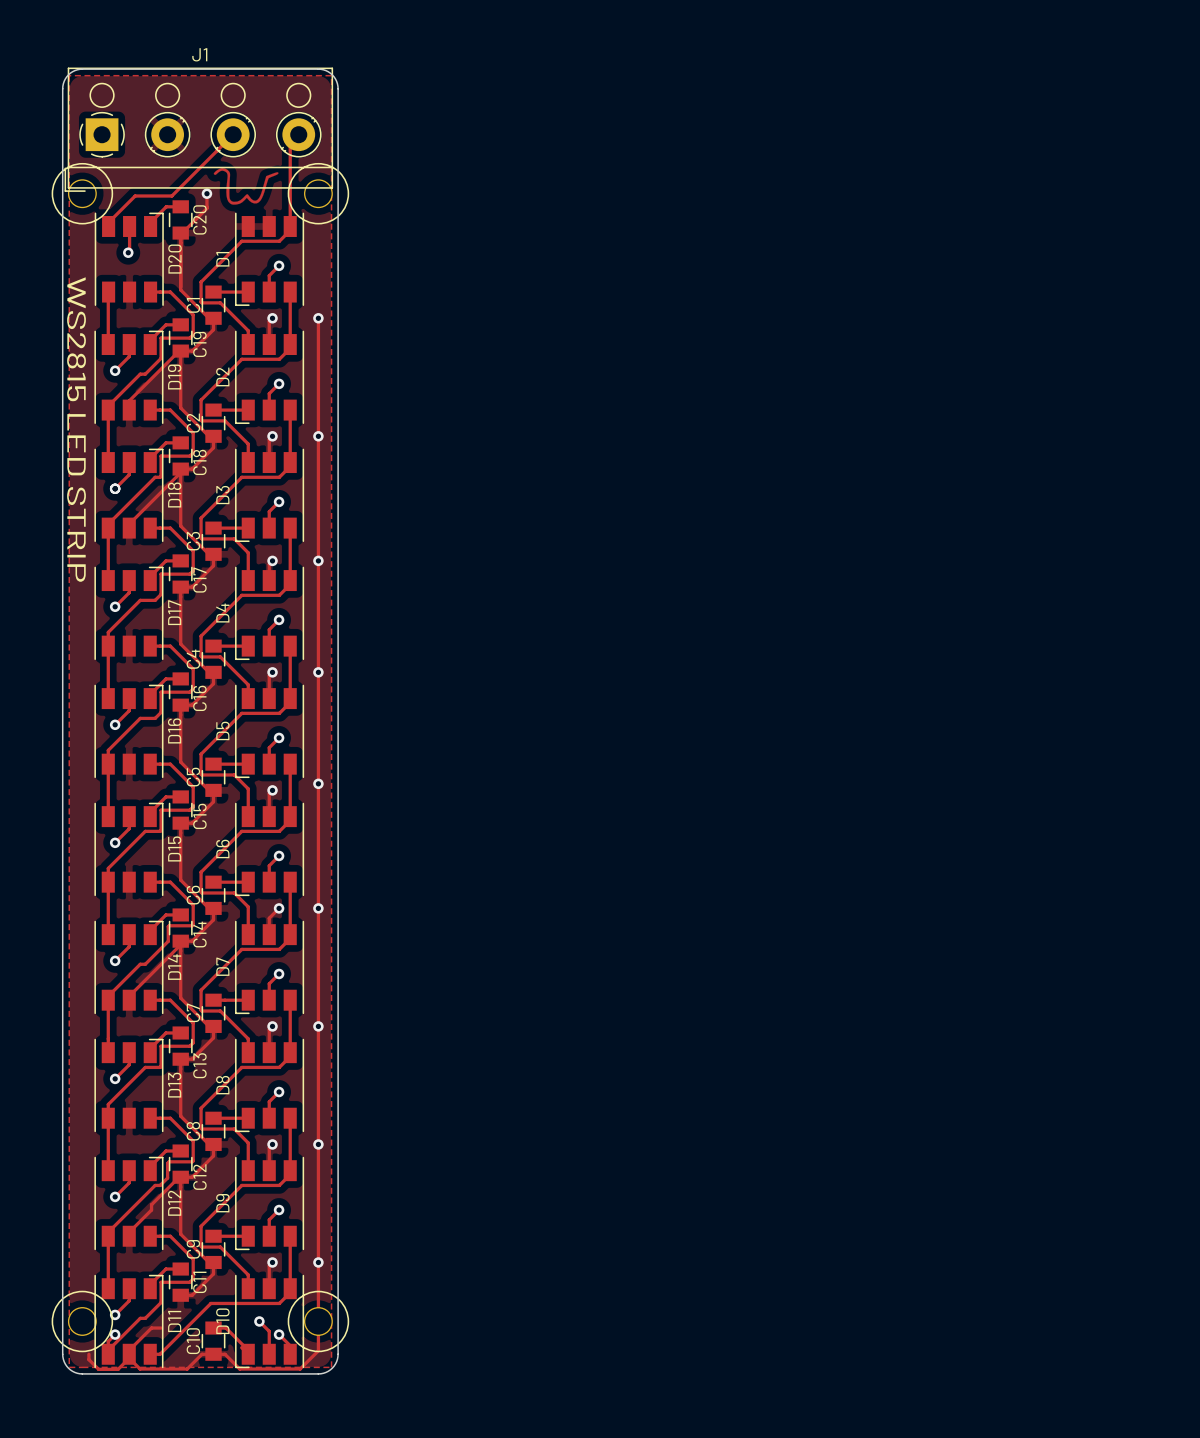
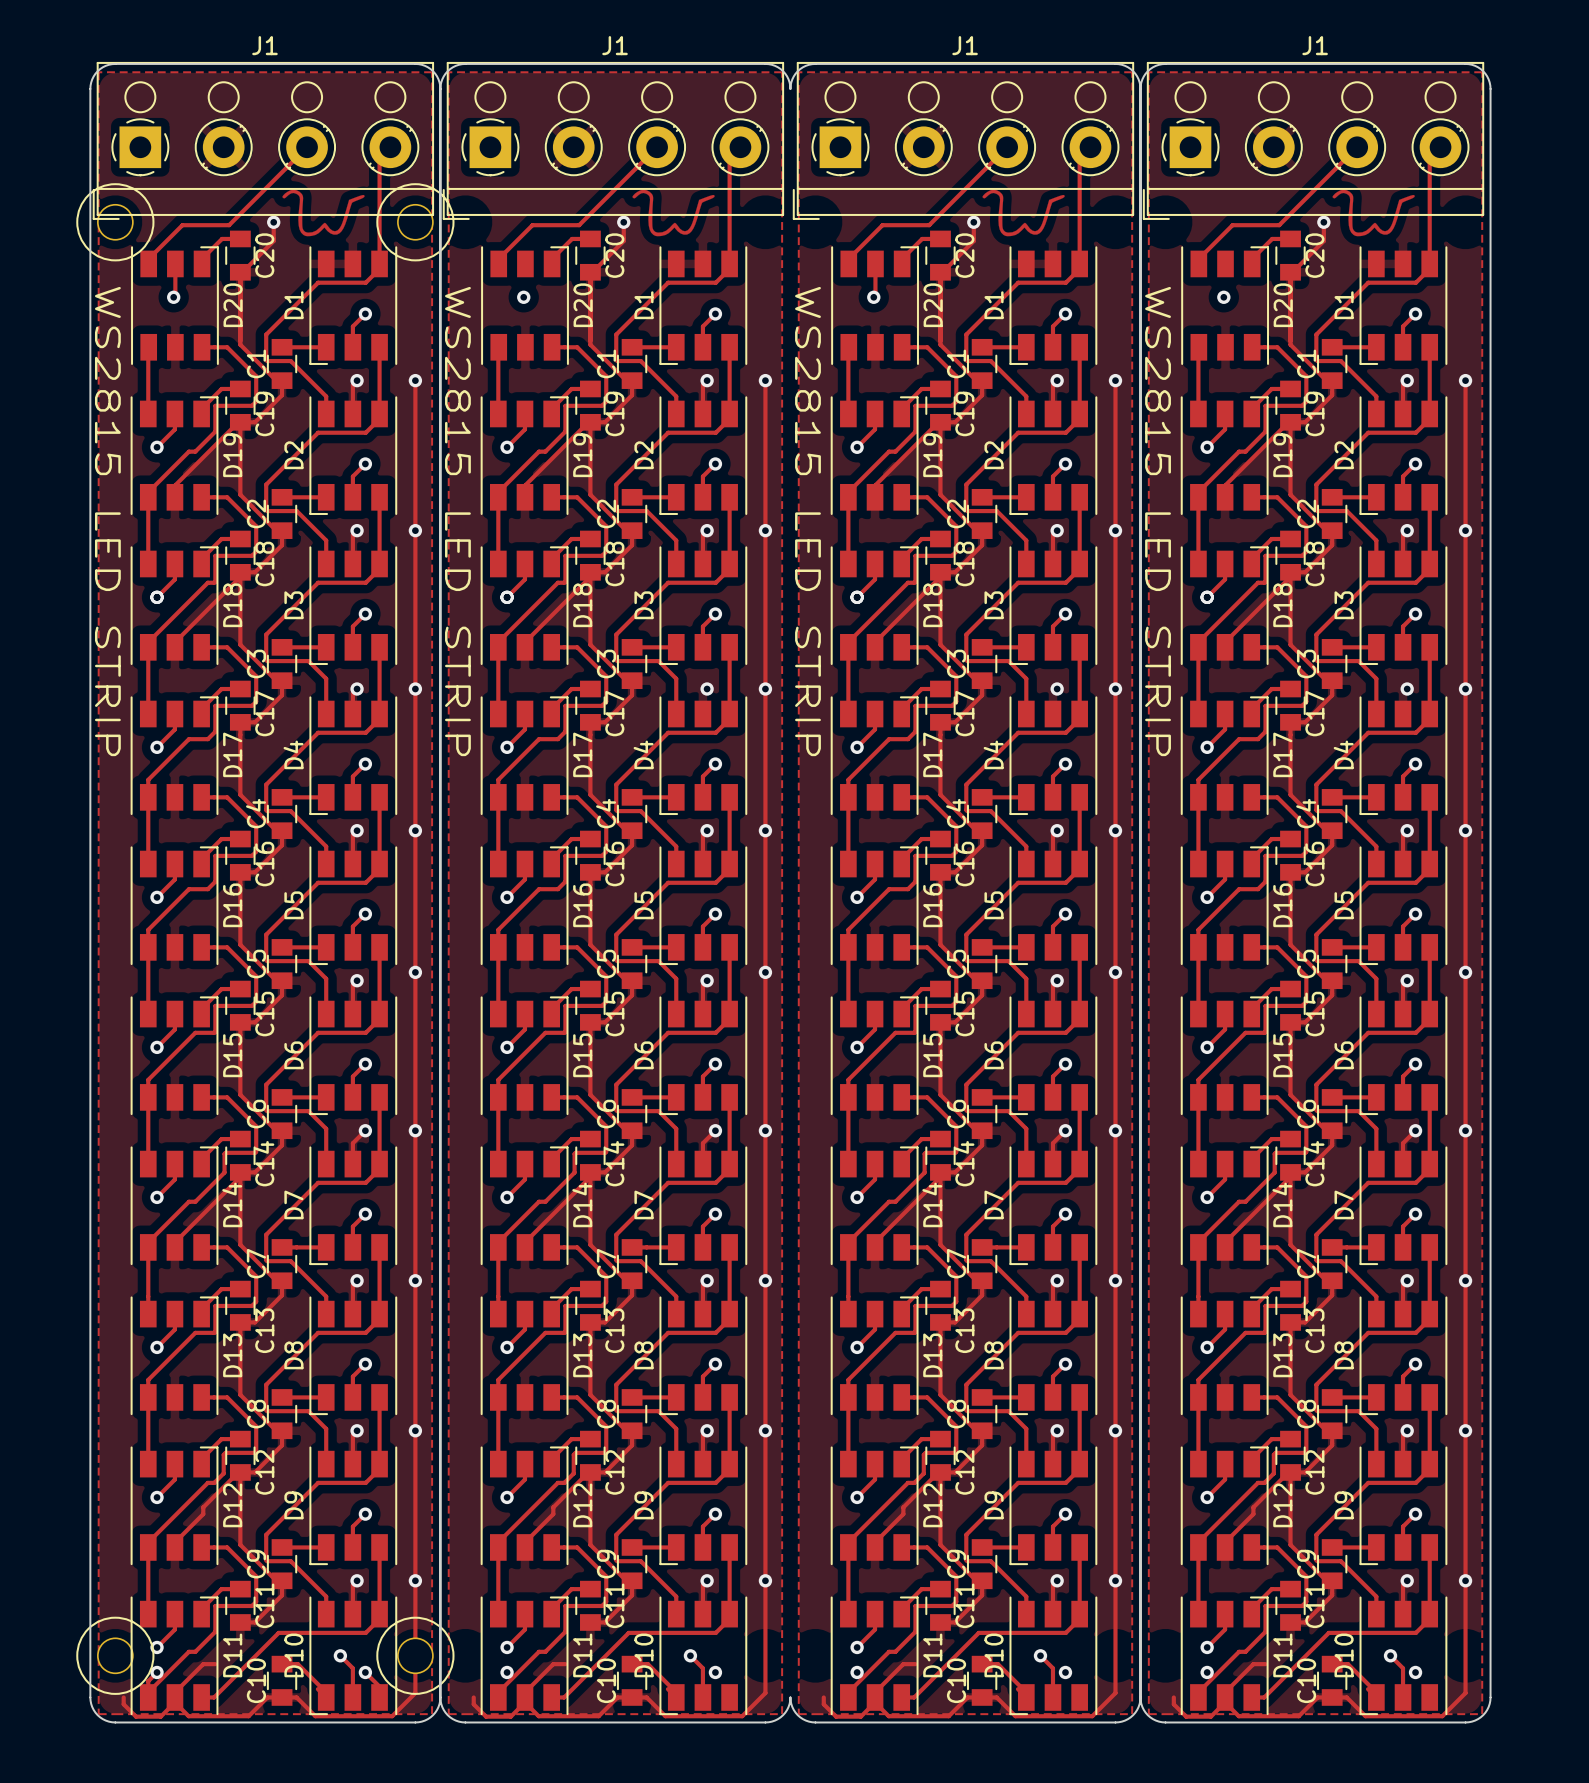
zone outline: none -> (448, 72) (782, 72) (782, 1714) (448, 1714) (448, 72)
zone outline: none -> (798, 72) (1132, 72) (1132, 1714) (798, 1714) (798, 72)
zone outline: none -> (1148, 72) (1482, 72) (1482, 1714) (1148, 1714) (1148, 72)
board edge: none -> (440, 88) (442, 79) (447, 71) (455, 65) (465, 63) (768, 64) (783, 71) (788, 79) (790, 88) (792, 79) (797, 71) (812, 64) (1115, 63) (1125, 65) (1133, 71) (1138, 79) (1140, 88)
board edge: none -> (1140, 88) (1142, 79) (1147, 71) (1155, 65) (1165, 63) (1468, 64) (1483, 71) (1488, 79) (1490, 88) (1489, 1703) (1480, 1717) (1465, 1722) (1165, 1722) (1155, 1720) (1147, 1715) (1142, 1707) (1140, 1697)
J1: none -> (613, 140)
J1: none -> (963, 140)
J1: none -> (1313, 140)
track: none -> (657, 147) (579, 225) (532, 225) (498, 258) (498, 263)
track: none -> (740, 147) (729, 158) (729, 268) (715, 282) (668, 282) (616, 334) (616, 359) (640, 361) (676, 396) (676, 413)
track: none -> (1007, 147) (929, 225) (882, 225) (848, 258) (848, 263)
track: none -> (1090, 147) (1079, 158) (1079, 268) (1065, 282) (1018, 282) (966, 334) (966, 359) (990, 361) (1026, 396) (1026, 413)
track: none -> (1357, 147) (1279, 225) (1232, 225) (1198, 258) (1198, 263)
track: none -> (1440, 147) (1429, 158) (1429, 268) (1415, 282) (1368, 282) (1316, 334) (1316, 359) (1340, 361) (1376, 396) (1376, 413)
drawing: none -> [632, 189, 715, 237]
drawing: none -> [982, 189, 1065, 237]
drawing: none -> [1332, 189, 1415, 237]
track: none -> (623, 222) (623, 241) (590, 272) (590, 344) (626, 380) (632, 380) (632, 395) (605, 422) (588, 422) (524, 485) (524, 497)
via: none -> (623, 222)
track: none -> (973, 222) (973, 241) (940, 272) (940, 344) (976, 380) (982, 380) (982, 395) (955, 422) (938, 422) (875, 485) (875, 497)
via: none -> (973, 222)
track: none -> (1323, 222) (1323, 241) (1290, 272) (1290, 344) (1326, 380) (1332, 380) (1332, 395) (1305, 422) (1288, 422) (1225, 485) (1225, 497)
via: none -> (1323, 222)
track: none -> (590, 238) (572, 238) (552, 258) (552, 263)
track: none -> (940, 238) (922, 238) (902, 258) (902, 263)
track: none -> (1290, 238) (1272, 238) (1252, 258) (1252, 263)
C20: none -> (590, 255)
C20: none -> (940, 255)
C20: none -> (1290, 255)
track: none -> (875, 263) (875, 295) (873, 297)
via: none -> (523, 297)
via: none -> (873, 297)
via: none -> (1223, 297)
D20: none -> (524, 305)
D1: none -> (703, 305)
D20: none -> (875, 305)
D1: none -> (1053, 305)
D20: none -> (1225, 305)
D1: none -> (1403, 305)
track: none -> (715, 313) (702, 326) (702, 347)
via: none -> (715, 313)
track: none -> (1065, 313) (1052, 326) (1052, 347)
via: none -> (1065, 313)
track: none -> (1415, 313) (1403, 326) (1403, 347)
via: none -> (1415, 313)
track: none -> (498, 347) (498, 413)
track: none -> (552, 347) (577, 347) (606, 376) (606, 401) (602, 405) (565, 405) (565, 431) (545, 451) (539, 451) (498, 492) (498, 563)
track: none -> (632, 347) (676, 347)
track: none -> (729, 347) (729, 418) (715, 432) (668, 432) (616, 484) (616, 509) (646, 511) (676, 540) (676, 563)
track: none -> (848, 347) (848, 413)
track: none -> (902, 347) (927, 347) (956, 376) (956, 401) (952, 405) (915, 405) (915, 431) (895, 451) (889, 451) (848, 492) (848, 563)
track: none -> (982, 347) (1026, 347)
track: none -> (1079, 347) (1079, 418) (1065, 432) (1018, 432) (966, 484) (966, 509) (996, 511) (1026, 540) (1026, 563)
track: none -> (1198, 347) (1198, 413)
track: none -> (1252, 347) (1277, 347) (1306, 376) (1306, 401) (1302, 405) (1265, 405) (1265, 431) (1245, 451) (1239, 451) (1198, 492) (1198, 563)
track: none -> (1332, 347) (1376, 347)
track: none -> (1429, 347) (1429, 418) (1415, 432) (1368, 432) (1316, 484) (1316, 509) (1346, 511) (1376, 540) (1376, 563)
C1: none -> (632, 363)
C1: none -> (982, 363)
C1: none -> (1332, 363)
track: none -> (707, 380) (702, 384) (702, 413)
via: none -> (707, 380)
track: none -> (765, 380) (765, 1693) (742, 1716) (665, 1716) (646, 1697) (617, 1697) (598, 1716) (538, 1716) (524, 1702)
via: none -> (765, 380)
track: none -> (1057, 380) (1052, 384) (1052, 413)
via: none -> (1057, 380)
track: none -> (1115, 380) (1115, 1693) (1092, 1716) (1015, 1716) (996, 1697) (967, 1697) (948, 1716) (888, 1716) (875, 1702)
via: none -> (1115, 380)
track: none -> (1407, 380) (1403, 384) (1403, 413)
via: none -> (1407, 380)
track: none -> (1465, 380) (1465, 1693) (1442, 1716) (1365, 1716) (1346, 1697) (1317, 1697) (1298, 1716) (1238, 1716) (1225, 1702)
via: none -> (1465, 380)
track: none -> (590, 388) (571, 388) (551, 408) (551, 413)
track: none -> (940, 388) (921, 388) (901, 408) (901, 413)
track: none -> (1290, 388) (1271, 388) (1251, 408) (1251, 413)
C19: none -> (590, 405)
C19: none -> (940, 405)
C19: none -> (1290, 405)
track: none -> (524, 413) (524, 429) (507, 447)
track: none -> (875, 413) (875, 429) (857, 447)
track: none -> (1225, 413) (1225, 429) (1207, 447)
track: none -> (590, 422) (590, 494) (626, 530) (632, 530) (632, 545) (605, 572) (590, 572) (590, 644) (626, 680) (632, 680) (632, 695) (605, 722) (590, 722) (590, 794) (626, 830) (632, 830) (632, 845) (605, 872) (590, 872) (590, 944) (626, 980) (632, 980) (632, 995) (605, 1022) (590, 1022) (590, 1094) (626, 1130) (632, 1130) (632, 1145) (605, 1172) (590, 1172) (590, 1244) (626, 1280) (632, 1280) (632, 1295) (605, 1322) (590, 1322) (590, 1394) (626, 1430) (632, 1430) (632, 1445) (605, 1472) (588, 1472) (553, 1507) (553, 1514) (524, 1542) (524, 1547)
track: none -> (940, 422) (940, 494) (976, 530) (982, 530) (982, 545) (955, 572) (940, 572) (940, 644) (976, 680) (982, 680) (982, 695) (955, 722) (940, 722) (940, 794) (976, 830) (982, 830) (982, 845) (955, 872) (940, 872) (940, 944) (976, 980) (982, 980) (982, 995) (955, 1022) (940, 1022) (940, 1094) (976, 1130) (982, 1130) (982, 1145) (955, 1172) (940, 1172) (940, 1244) (976, 1280) (982, 1280) (982, 1295) (955, 1322) (940, 1322) (940, 1394) (976, 1430) (982, 1430) (982, 1445) (955, 1472) (938, 1472) (903, 1507) (903, 1514) (875, 1542) (875, 1547)
track: none -> (1290, 422) (1290, 494) (1326, 530) (1332, 530) (1332, 545) (1305, 572) (1290, 572) (1290, 644) (1326, 680) (1332, 680) (1332, 695) (1305, 722) (1290, 722) (1290, 794) (1326, 830) (1332, 830) (1332, 845) (1305, 872) (1290, 872) (1290, 944) (1326, 980) (1332, 980) (1332, 995) (1305, 1022) (1290, 1022) (1290, 1094) (1326, 1130) (1332, 1130) (1332, 1145) (1305, 1172) (1290, 1172) (1290, 1244) (1326, 1280) (1332, 1280) (1332, 1295) (1305, 1322) (1290, 1322) (1290, 1394) (1326, 1430) (1332, 1430) (1332, 1445) (1305, 1472) (1288, 1472) (1253, 1507) (1253, 1514) (1225, 1542) (1225, 1547)
via: none -> (507, 447)
via: none -> (857, 447)
via: none -> (1207, 447)
D19: none -> (524, 455)
D2: none -> (703, 455)
D19: none -> (874, 455)
D2: none -> (1053, 455)
D19: none -> (1224, 455)
D2: none -> (1403, 455)
track: none -> (715, 463) (702, 476) (702, 497)
via: none -> (715, 463)
track: none -> (1065, 463) (1052, 476) (1052, 497)
via: none -> (1065, 463)
track: none -> (1415, 463) (1403, 476) (1403, 497)
via: none -> (1415, 463)
track: none -> (551, 497) (577, 497) (606, 526) (606, 551) (602, 555) (565, 555) (565, 581) (557, 582) (498, 642) (498, 714)
track: none -> (632, 497) (676, 497)
track: none -> (729, 497) (729, 568) (715, 582) (668, 582) (616, 634) (617, 661) (658, 661) (676, 678) (676, 714)
track: none -> (901, 497) (927, 497) (956, 526) (956, 551) (952, 555) (915, 555) (915, 581) (907, 582) (848, 642) (848, 714)
track: none -> (982, 497) (1026, 497)
track: none -> (1079, 497) (1079, 568) (1065, 582) (1018, 582) (966, 634) (967, 661) (1008, 661) (1026, 678) (1026, 714)
track: none -> (1251, 497) (1277, 497) (1306, 526) (1306, 551) (1302, 555) (1265, 555) (1265, 581) (1258, 582) (1198, 642) (1198, 714)
track: none -> (1332, 497) (1376, 497)
track: none -> (1429, 497) (1429, 568) (1415, 582) (1368, 582) (1316, 634) (1317, 661) (1358, 661) (1376, 678) (1376, 714)
C2: none -> (632, 513)
C2: none -> (982, 513)
C2: none -> (1332, 513)
text: none -> WS2815 LED STRIP (457, 521)
text: none -> WS2815 LED STRIP (807, 521)
text: none -> WS2815 LED STRIP (1158, 521)
track: none -> (707, 530) (702, 534) (702, 563)
via: none -> (707, 530)
via: none -> (765, 530)
track: none -> (1057, 530) (1052, 534) (1052, 563)
via: none -> (1057, 530)
via: none -> (1115, 530)
track: none -> (1407, 530) (1403, 534) (1403, 563)
via: none -> (1407, 530)
via: none -> (1465, 530)
track: none -> (590, 538) (571, 538) (551, 558) (551, 563)
track: none -> (940, 538) (921, 538) (901, 558) (901, 563)
track: none -> (1290, 538) (1271, 538) (1251, 558) (1251, 563)
C18: none -> (590, 555)
C18: none -> (940, 555)
C18: none -> (1290, 555)
track: none -> (524, 563) (524, 579) (507, 597)
track: none -> (875, 563) (875, 579) (857, 597)
track: none -> (1225, 563) (1225, 579) (1207, 597)
track: none -> (590, 576) (524, 642) (524, 647)
track: none -> (940, 576) (875, 642) (875, 647)
track: none -> (1290, 576) (1225, 642) (1225, 647)
via: none -> (507, 597)
via: none -> (857, 597)
via: none -> (1207, 597)
D18: none -> (524, 605)
D3: none -> (703, 605)
D18: none -> (874, 605)
D3: none -> (1053, 605)
D18: none -> (1224, 605)
D3: none -> (1403, 605)
track: none -> (715, 614) (702, 626) (702, 647)
via: none -> (715, 614)
track: none -> (1065, 614) (1052, 626) (1052, 647)
via: none -> (1065, 614)
track: none -> (1415, 614) (1403, 626) (1403, 647)
via: none -> (1415, 614)
track: none -> (551, 647) (577, 647) (606, 676) (606, 701) (602, 705) (565, 705) (565, 731) (557, 739) (539, 739) (498, 779) (498, 864)
track: none -> (632, 647) (676, 647)
track: none -> (729, 647) (729, 719) (715, 732) (668, 732) (616, 784) (616, 810) (640, 811) (676, 846) (676, 864)
track: none -> (901, 647) (927, 647) (956, 676) (956, 701) (952, 705) (915, 705) (915, 731) (907, 739) (889, 739) (848, 779) (848, 864)
track: none -> (982, 647) (1026, 647)
track: none -> (1079, 647) (1079, 719) (1065, 732) (1018, 732) (966, 784) (966, 810) (990, 811) (1026, 846) (1026, 864)
track: none -> (1251, 647) (1277, 647) (1306, 676) (1306, 701) (1302, 705) (1265, 705) (1265, 731) (1258, 739) (1239, 739) (1198, 779) (1198, 864)
track: none -> (1332, 647) (1376, 647)
track: none -> (1429, 647) (1429, 719) (1415, 732) (1368, 732) (1316, 784) (1316, 810) (1340, 811) (1376, 846) (1376, 864)
C3: none -> (632, 664)
C3: none -> (982, 664)
C3: none -> (1332, 664)
track: none -> (590, 689) (571, 689) (551, 709) (551, 714)
via: none -> (707, 689)
via: none -> (765, 689)
track: none -> (940, 689) (921, 689) (901, 709) (901, 714)
via: none -> (1057, 689)
via: none -> (1115, 689)
track: none -> (1290, 689) (1271, 689) (1251, 709) (1251, 714)
via: none -> (1407, 689)
via: none -> (1465, 689)
C17: none -> (590, 705)
C17: none -> (940, 705)
C17: none -> (1290, 705)
track: none -> (524, 714) (524, 729) (507, 747)
track: none -> (875, 714) (875, 729) (857, 747)
track: none -> (1225, 714) (1225, 729) (1207, 747)
via: none -> (507, 747)
via: none -> (857, 747)
via: none -> (1207, 747)
D17: none -> (524, 755)
D4: none -> (703, 755)
D17: none -> (874, 755)
D4: none -> (1053, 755)
D17: none -> (1224, 755)
D4: none -> (1403, 755)
track: none -> (715, 764) (702, 776) (702, 797)
via: none -> (715, 764)
track: none -> (1065, 764) (1052, 776) (1052, 797)
via: none -> (1065, 764)
track: none -> (1415, 764) (1403, 776) (1403, 797)
via: none -> (1415, 764)
track: none -> (551, 797) (577, 797) (606, 826) (606, 851) (602, 855) (565, 855) (565, 881) (557, 889) (539, 889) (498, 929) (498, 1014)
track: none -> (632, 797) (676, 797)
track: none -> (729, 797) (729, 869) (715, 882) (668, 882) (616, 934) (617, 961) (658, 961) (676, 978) (676, 1014)
track: none -> (901, 797) (927, 797) (956, 826) (956, 851) (952, 855) (915, 855) (915, 881) (907, 889) (889, 889) (848, 929) (848, 1014)
track: none -> (982, 797) (1026, 797)
track: none -> (1079, 797) (1079, 869) (1065, 882) (1018, 882) (966, 934) (967, 961) (1008, 961) (1026, 978) (1026, 1014)
track: none -> (1251, 797) (1277, 797) (1306, 826) (1306, 851) (1302, 855) (1265, 855) (1265, 881) (1258, 889) (1239, 889) (1198, 929) (1198, 1014)
track: none -> (1332, 797) (1376, 797)
track: none -> (1429, 797) (1429, 869) (1415, 882) (1368, 882) (1316, 934) (1317, 961) (1358, 961) (1376, 978) (1376, 1014)
C4: none -> (632, 814)
C4: none -> (982, 814)
C4: none -> (1332, 814)
track: none -> (707, 830) (702, 834) (702, 864)
via: none -> (707, 830)
via: none -> (765, 830)
track: none -> (1057, 830) (1052, 834) (1052, 864)
via: none -> (1057, 830)
via: none -> (1115, 830)
track: none -> (1407, 830) (1403, 834) (1403, 864)
via: none -> (1407, 830)
via: none -> (1465, 830)
track: none -> (590, 839) (571, 839) (551, 859) (551, 864)
track: none -> (940, 839) (921, 839) (901, 859) (901, 864)
track: none -> (1290, 839) (1271, 839) (1251, 859) (1251, 864)
C16: none -> (590, 855)
C16: none -> (940, 855)
C16: none -> (1290, 855)
track: none -> (524, 864) (524, 879) (507, 897)
track: none -> (875, 864) (875, 879) (857, 897)
track: none -> (1225, 864) (1225, 879) (1207, 897)
via: none -> (507, 897)
via: none -> (857, 897)
via: none -> (1207, 897)
D16: none -> (524, 905)
D5: none -> (703, 905)
D16: none -> (874, 905)
D5: none -> (1053, 905)
D16: none -> (1224, 905)
D5: none -> (1403, 905)
track: none -> (715, 914) (702, 926) (702, 947)
via: none -> (715, 914)
track: none -> (1065, 914) (1052, 926) (1052, 947)
via: none -> (1065, 914)
track: none -> (1415, 914) (1403, 926) (1403, 947)
via: none -> (1415, 914)
track: none -> (551, 947) (577, 947) (606, 976) (606, 1001) (602, 1005) (565, 1005) (565, 1031) (545, 1032) (498, 1079) (498, 1164)
track: none -> (632, 947) (676, 947)
track: none -> (729, 947) (729, 1019) (715, 1032) (668, 1032) (616, 1084) (617, 1111) (658, 1111) (676, 1128) (676, 1164)
track: none -> (901, 947) (927, 947) (956, 976) (956, 1001) (952, 1005) (915, 1005) (915, 1031) (895, 1032) (848, 1079) (848, 1164)
track: none -> (982, 947) (1026, 947)
track: none -> (1079, 947) (1079, 1019) (1065, 1032) (1018, 1032) (966, 1084) (967, 1111) (1008, 1111) (1026, 1128) (1026, 1164)
track: none -> (1251, 947) (1277, 947) (1306, 976) (1306, 1001) (1302, 1005) (1265, 1005) (1265, 1031) (1245, 1032) (1198, 1079) (1198, 1164)
track: none -> (1332, 947) (1376, 947)
track: none -> (1429, 947) (1429, 1019) (1415, 1032) (1368, 1032) (1316, 1084) (1317, 1111) (1358, 1111) (1376, 1128) (1376, 1164)
C5: none -> (632, 964)
C5: none -> (982, 964)
C5: none -> (1332, 964)
via: none -> (765, 972)
via: none -> (1115, 972)
via: none -> (1465, 972)
track: none -> (707, 980) (702, 984) (702, 1014)
via: none -> (707, 980)
track: none -> (1057, 980) (1052, 984) (1052, 1014)
via: none -> (1057, 980)
track: none -> (1407, 980) (1403, 984) (1403, 1014)
via: none -> (1407, 980)
track: none -> (590, 989) (571, 989) (551, 1009) (551, 1014)
track: none -> (940, 989) (921, 989) (901, 1009) (901, 1014)
track: none -> (1290, 989) (1271, 989) (1251, 1009) (1251, 1014)
C15: none -> (590, 1005)
C15: none -> (940, 1005)
C15: none -> (1290, 1005)
track: none -> (524, 1014) (524, 1029) (507, 1047)
track: none -> (875, 1014) (875, 1029) (857, 1047)
track: none -> (1225, 1014) (1225, 1029) (1207, 1047)
via: none -> (507, 1047)
via: none -> (857, 1047)
via: none -> (1207, 1047)
D15: none -> (524, 1055)
D6: none -> (703, 1055)
D15: none -> (874, 1055)
D6: none -> (1053, 1055)
D15: none -> (1224, 1055)
D6: none -> (1403, 1055)
track: none -> (715, 1064) (702, 1076) (702, 1097)
via: none -> (715, 1064)
track: none -> (1065, 1064) (1052, 1076) (1052, 1097)
via: none -> (1065, 1064)
track: none -> (1415, 1064) (1403, 1076) (1403, 1097)
via: none -> (1415, 1064)
track: none -> (551, 1097) (577, 1097) (606, 1126) (606, 1151) (575, 1152) (574, 1172) (545, 1201) (539, 1201) (498, 1242) (498, 1314)
track: none -> (632, 1097) (676, 1097)
track: none -> (729, 1097) (729, 1169) (715, 1182) (668, 1182) (616, 1234) (616, 1260) (640, 1261) (676, 1296) (676, 1314)
track: none -> (901, 1097) (927, 1097) (956, 1126) (956, 1151) (925, 1152) (924, 1172) (895, 1201) (889, 1201) (848, 1242) (848, 1314)
track: none -> (982, 1097) (1026, 1097)
track: none -> (1079, 1097) (1079, 1169) (1065, 1182) (1018, 1182) (966, 1234) (966, 1260) (990, 1261) (1026, 1296) (1026, 1314)
track: none -> (1251, 1097) (1277, 1097) (1306, 1126) (1306, 1151) (1275, 1152) (1274, 1172) (1245, 1201) (1239, 1201) (1198, 1242) (1198, 1314)
track: none -> (1332, 1097) (1376, 1097)
track: none -> (1429, 1097) (1429, 1169) (1415, 1182) (1368, 1182) (1316, 1234) (1316, 1260) (1340, 1261) (1376, 1296) (1376, 1314)
C6: none -> (632, 1114)
C6: none -> (982, 1114)
C6: none -> (1332, 1114)
track: none -> (715, 1130) (702, 1143) (702, 1164)
via: none -> (715, 1130)
via: none -> (765, 1130)
track: none -> (1065, 1130) (1052, 1143) (1052, 1164)
via: none -> (1065, 1130)
via: none -> (1115, 1130)
track: none -> (1415, 1130) (1403, 1143) (1403, 1164)
via: none -> (1415, 1130)
via: none -> (1465, 1130)
track: none -> (590, 1139) (571, 1139) (551, 1159) (551, 1164)
track: none -> (940, 1139) (921, 1139) (901, 1159) (901, 1164)
track: none -> (1290, 1139) (1271, 1139) (1251, 1159) (1251, 1164)
C14: none -> (590, 1155)
C14: none -> (940, 1155)
C14: none -> (1290, 1155)
track: none -> (524, 1164) (524, 1179) (507, 1197)
track: none -> (875, 1164) (875, 1179) (857, 1197)
track: none -> (1225, 1164) (1225, 1179) (1207, 1197)
track: none -> (590, 1176) (524, 1242) (524, 1247)
track: none -> (940, 1176) (875, 1242) (875, 1247)
track: none -> (1290, 1176) (1225, 1242) (1225, 1247)
via: none -> (507, 1197)
via: none -> (857, 1197)
via: none -> (1207, 1197)
D14: none -> (524, 1205)
D7: none -> (703, 1205)
D14: none -> (874, 1205)
D7: none -> (1053, 1205)
D14: none -> (1224, 1205)
D7: none -> (1403, 1205)
track: none -> (715, 1214) (702, 1226) (702, 1247)
via: none -> (715, 1214)
track: none -> (1065, 1214) (1052, 1226) (1052, 1247)
via: none -> (1065, 1214)
track: none -> (1415, 1214) (1403, 1226) (1403, 1247)
via: none -> (1415, 1214)
track: none -> (551, 1247) (577, 1247) (606, 1276) (606, 1301) (602, 1305) (565, 1305) (565, 1331) (545, 1332) (498, 1379) (498, 1464)
track: none -> (632, 1247) (676, 1247)
track: none -> (729, 1247) (729, 1319) (715, 1332) (668, 1332) (616, 1384) (617, 1411) (658, 1411) (676, 1428) (676, 1464)
track: none -> (901, 1247) (927, 1247) (956, 1276) (956, 1301) (952, 1305) (915, 1305) (915, 1331) (895, 1332) (848, 1379) (848, 1464)
track: none -> (982, 1247) (1026, 1247)
track: none -> (1079, 1247) (1079, 1319) (1065, 1332) (1018, 1332) (966, 1384) (967, 1411) (1008, 1411) (1026, 1428) (1026, 1464)
track: none -> (1251, 1247) (1277, 1247) (1306, 1276) (1306, 1301) (1302, 1305) (1265, 1305) (1265, 1331) (1245, 1332) (1198, 1379) (1198, 1464)
track: none -> (1332, 1247) (1376, 1247)
track: none -> (1429, 1247) (1429, 1319) (1415, 1332) (1368, 1332) (1316, 1384) (1317, 1411) (1358, 1411) (1376, 1428) (1376, 1464)
C7: none -> (632, 1264)
C7: none -> (982, 1264)
C7: none -> (1332, 1264)
track: none -> (707, 1280) (702, 1284) (702, 1314)
via: none -> (707, 1280)
via: none -> (765, 1280)
track: none -> (1057, 1280) (1052, 1284) (1052, 1314)
via: none -> (1057, 1280)
via: none -> (1115, 1280)
track: none -> (1407, 1280) (1403, 1284) (1403, 1314)
via: none -> (1407, 1280)
via: none -> (1465, 1280)
track: none -> (590, 1289) (571, 1289) (551, 1309) (551, 1314)
track: none -> (940, 1289) (921, 1289) (901, 1309) (901, 1314)
track: none -> (1290, 1289) (1271, 1289) (1251, 1309) (1251, 1314)
C13: none -> (590, 1305)
C13: none -> (940, 1305)
C13: none -> (1290, 1305)
track: none -> (524, 1314) (524, 1329) (507, 1347)
track: none -> (875, 1314) (875, 1329) (857, 1347)
track: none -> (1225, 1314) (1225, 1329) (1207, 1347)
via: none -> (507, 1347)
via: none -> (857, 1347)
via: none -> (1207, 1347)
D13: none -> (524, 1355)
D8: none -> (703, 1355)
D13: none -> (874, 1355)
D8: none -> (1053, 1355)
D13: none -> (1224, 1355)
D8: none -> (1403, 1355)
track: none -> (715, 1364) (702, 1376) (702, 1397)
via: none -> (715, 1364)
track: none -> (1065, 1364) (1052, 1376) (1052, 1397)
via: none -> (1065, 1364)
track: none -> (1415, 1364) (1403, 1376) (1403, 1397)
via: none -> (1415, 1364)
track: none -> (551, 1397) (577, 1397) (606, 1426) (606, 1451) (575, 1452) (573, 1454) (573, 1473) (564, 1482) (557, 1482) (498, 1542) (498, 1614)
track: none -> (632, 1397) (676, 1397)
track: none -> (729, 1397) (729, 1469) (715, 1482) (668, 1482) (616, 1534) (616, 1560) (640, 1561) (676, 1596) (676, 1614)
track: none -> (901, 1397) (927, 1397) (956, 1426) (956, 1451) (925, 1452) (923, 1454) (923, 1473) (914, 1482) (907, 1482) (848, 1542) (848, 1614)
track: none -> (982, 1397) (1026, 1397)
track: none -> (1079, 1397) (1079, 1469) (1065, 1482) (1018, 1482) (966, 1534) (966, 1560) (990, 1561) (1026, 1596) (1026, 1614)
track: none -> (1251, 1397) (1277, 1397) (1306, 1426) (1306, 1451) (1275, 1452) (1273, 1454) (1273, 1473) (1264, 1482) (1258, 1482) (1198, 1542) (1198, 1614)
track: none -> (1332, 1397) (1376, 1397)
track: none -> (1429, 1397) (1429, 1469) (1415, 1482) (1368, 1482) (1316, 1534) (1316, 1560) (1340, 1561) (1376, 1596) (1376, 1614)
C8: none -> (632, 1414)
C8: none -> (982, 1414)
C8: none -> (1332, 1414)
track: none -> (707, 1430) (702, 1434) (702, 1464)
via: none -> (707, 1430)
via: none -> (765, 1430)
track: none -> (1057, 1430) (1052, 1434) (1052, 1464)
via: none -> (1057, 1430)
via: none -> (1115, 1430)
track: none -> (1407, 1430) (1403, 1434) (1403, 1464)
via: none -> (1407, 1430)
via: none -> (1465, 1430)
track: none -> (590, 1439) (571, 1439) (551, 1459) (551, 1464)
track: none -> (940, 1439) (921, 1439) (901, 1459) (901, 1464)
track: none -> (1290, 1439) (1271, 1439) (1251, 1459) (1251, 1464)
C12: none -> (590, 1455)
C12: none -> (940, 1455)
C12: none -> (1290, 1455)
track: none -> (524, 1464) (524, 1479) (507, 1497)
track: none -> (875, 1464) (875, 1479) (857, 1497)
track: none -> (1225, 1464) (1225, 1479) (1207, 1497)
track: none -> (590, 1472) (590, 1544) (626, 1580) (632, 1580) (632, 1595) (605, 1622) (590, 1622)
track: none -> (940, 1472) (940, 1544) (976, 1580) (982, 1580) (982, 1595) (955, 1622) (940, 1622)
track: none -> (1290, 1472) (1290, 1544) (1326, 1580) (1332, 1580) (1332, 1595) (1305, 1622) (1290, 1622)
via: none -> (507, 1497)
via: none -> (857, 1497)
via: none -> (1207, 1497)
D12: none -> (524, 1505)
D9: none -> (703, 1505)
D12: none -> (874, 1505)
D9: none -> (1053, 1505)
D12: none -> (1224, 1505)
D9: none -> (1403, 1505)
track: none -> (715, 1514) (702, 1526) (702, 1547)
via: none -> (715, 1514)
track: none -> (1065, 1514) (1052, 1526) (1052, 1547)
via: none -> (1065, 1514)
track: none -> (1415, 1514) (1403, 1526) (1403, 1547)
via: none -> (1415, 1514)
track: none -> (551, 1547) (577, 1547) (606, 1576) (606, 1601) (602, 1605) (565, 1605) (565, 1631) (545, 1651) (539, 1651) (498, 1692)
track: none -> (632, 1547) (676, 1547)
track: none -> (729, 1547) (729, 1619) (715, 1632) (628, 1632) (564, 1697) (551, 1697)
track: none -> (901, 1547) (927, 1547) (956, 1576) (956, 1601) (952, 1605) (915, 1605) (915, 1631) (895, 1651) (889, 1651) (848, 1692)
track: none -> (982, 1547) (1026, 1547)
track: none -> (1079, 1547) (1079, 1619) (1065, 1632) (978, 1632) (914, 1697) (901, 1697)
track: none -> (1251, 1547) (1277, 1547) (1306, 1576) (1306, 1601) (1302, 1605) (1265, 1605) (1265, 1631) (1245, 1651) (1239, 1651) (1198, 1692)
track: none -> (1332, 1547) (1376, 1547)
track: none -> (1429, 1547) (1429, 1619) (1415, 1632) (1328, 1632) (1264, 1697) (1251, 1697)
C9: none -> (632, 1564)
C9: none -> (982, 1564)
C9: none -> (1332, 1564)
track: none -> (707, 1580) (702, 1584) (702, 1614)
via: none -> (707, 1580)
via: none -> (765, 1580)
track: none -> (1057, 1580) (1052, 1584) (1052, 1614)
via: none -> (1057, 1580)
via: none -> (1115, 1580)
track: none -> (1407, 1580) (1403, 1584) (1403, 1614)
via: none -> (1407, 1580)
via: none -> (1465, 1580)
track: none -> (590, 1589) (571, 1589) (551, 1609) (551, 1614)
track: none -> (940, 1589) (921, 1589) (901, 1609) (901, 1614)
track: none -> (1290, 1589) (1271, 1589) (1251, 1609) (1251, 1614)
C11: none -> (590, 1605)
C11: none -> (940, 1605)
C11: none -> (1290, 1605)
track: none -> (524, 1614) (524, 1629) (507, 1647)
track: none -> (875, 1614) (875, 1629) (857, 1647)
track: none -> (1225, 1614) (1225, 1629) (1207, 1647)
via: none -> (507, 1647)
via: none -> (857, 1647)
via: none -> (1207, 1647)
D11: none -> (524, 1655)
track: none -> (690, 1655) (702, 1668) (702, 1697)
via: none -> (690, 1655)
D10: none -> (703, 1655)
D11: none -> (874, 1655)
track: none -> (1040, 1655) (1052, 1668) (1052, 1697)
via: none -> (1040, 1655)
D10: none -> (1053, 1655)
D11: none -> (1224, 1655)
track: none -> (1390, 1655) (1403, 1668) (1403, 1697)
via: none -> (1390, 1655)
D10: none -> (1403, 1655)
track: none -> (565, 1664) (553, 1664) (524, 1692) (524, 1702)
track: none -> (632, 1664) (647, 1664) (676, 1692) (676, 1697) (667, 1689)
track: none -> (915, 1664) (903, 1664) (875, 1692) (875, 1702)
track: none -> (982, 1664) (997, 1664) (1026, 1692) (1026, 1697) (1017, 1689)
track: none -> (1265, 1664) (1253, 1664) (1225, 1692) (1225, 1702)
track: none -> (1332, 1664) (1348, 1664) (1376, 1692) (1376, 1697) (1368, 1689)
via: none -> (507, 1672)
via: none -> (715, 1672)
via: none -> (857, 1672)
via: none -> (1065, 1672)
via: none -> (1207, 1672)
via: none -> (1415, 1672)
C10: none -> (632, 1680)
C10: none -> (982, 1680)
C10: none -> (1332, 1680)
board edge: none -> (440, 1697) (442, 1707) (447, 1715) (455, 1720) (465, 1722) (768, 1722) (783, 1715) (788, 1707) (790, 1697) (792, 1707) (797, 1715) (812, 1722) (1115, 1722) (1125, 1720) (1133, 1715) (1138, 1707) (1140, 1697)
track: none -> (473, 1697) (473, 1704) (486, 1716) (510, 1716) (524, 1702)
track: none -> (823, 1697) (823, 1704) (836, 1716) (860, 1716) (875, 1702)
track: none -> (1173, 1697) (1173, 1704) (1186, 1716) (1210, 1716) (1225, 1702)

